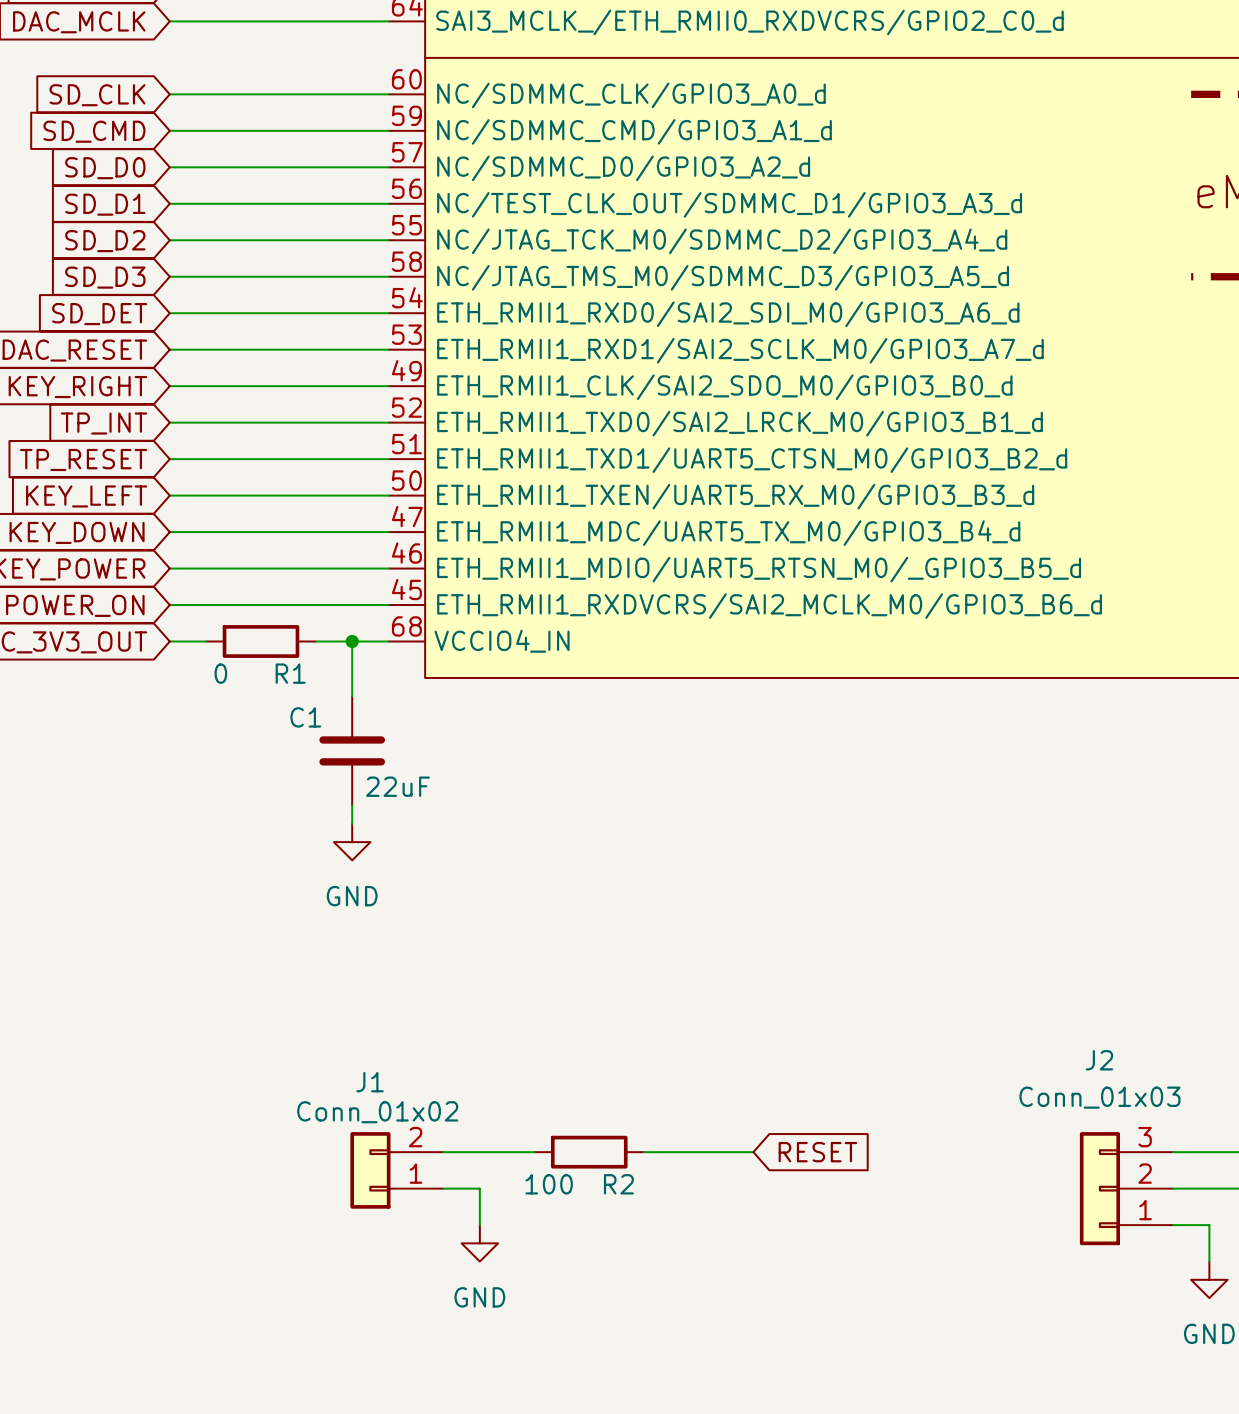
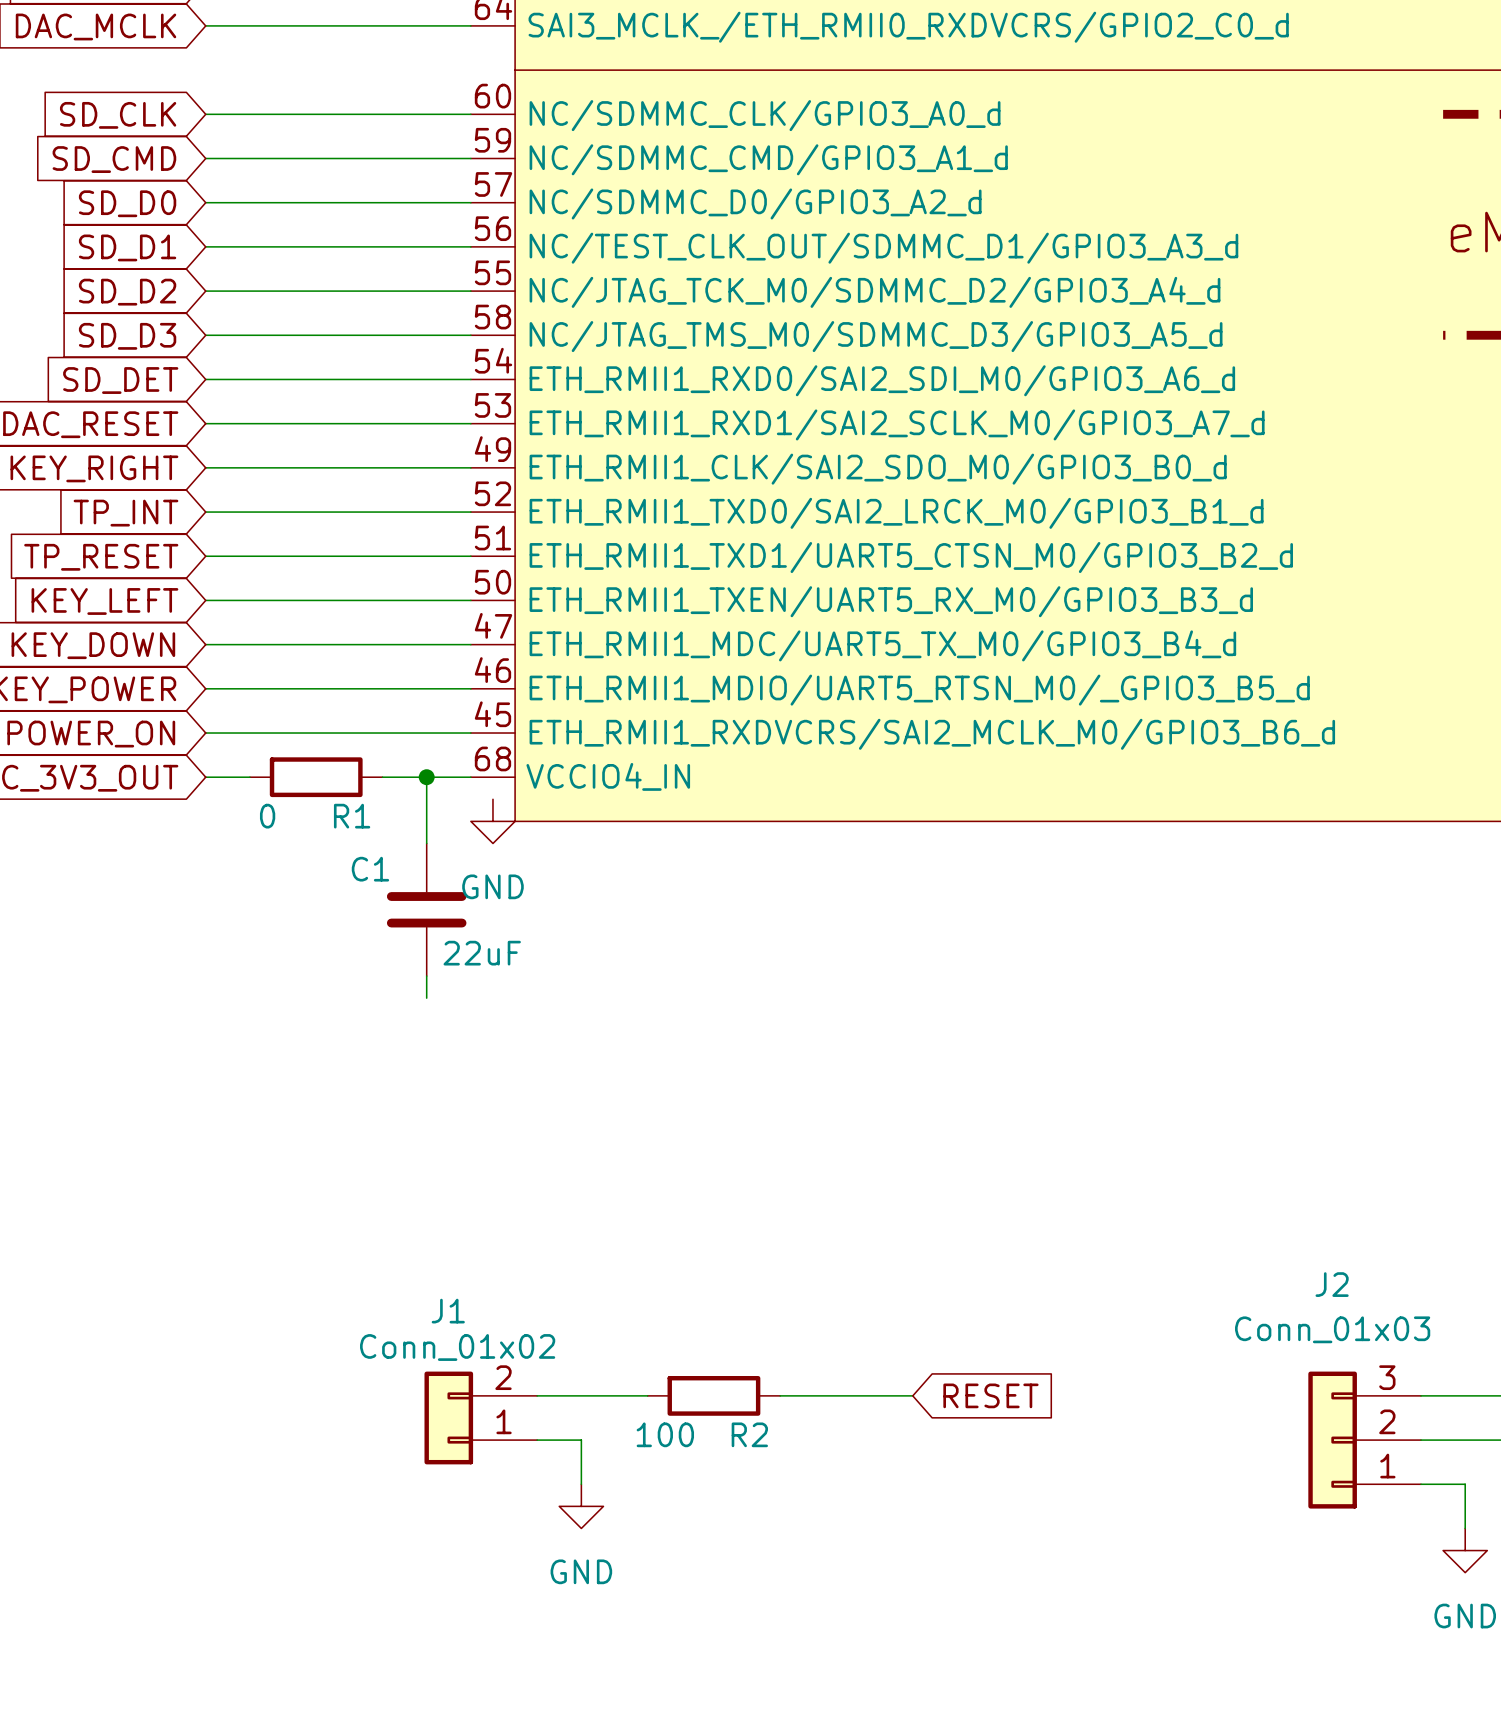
power symbol position: GND (352, 842) -> GND (492, 821)

